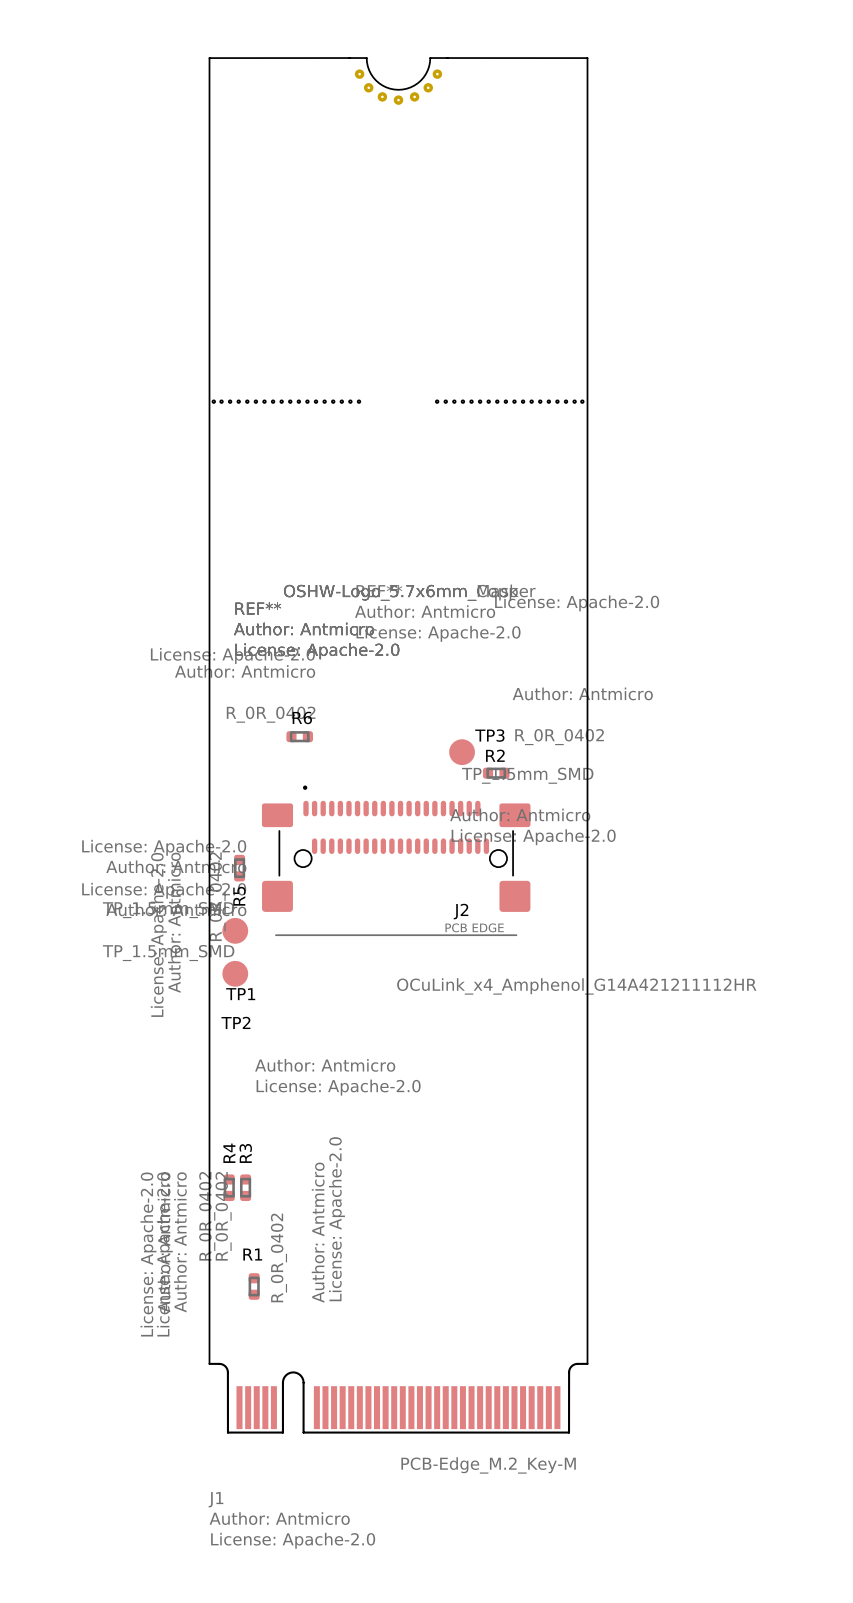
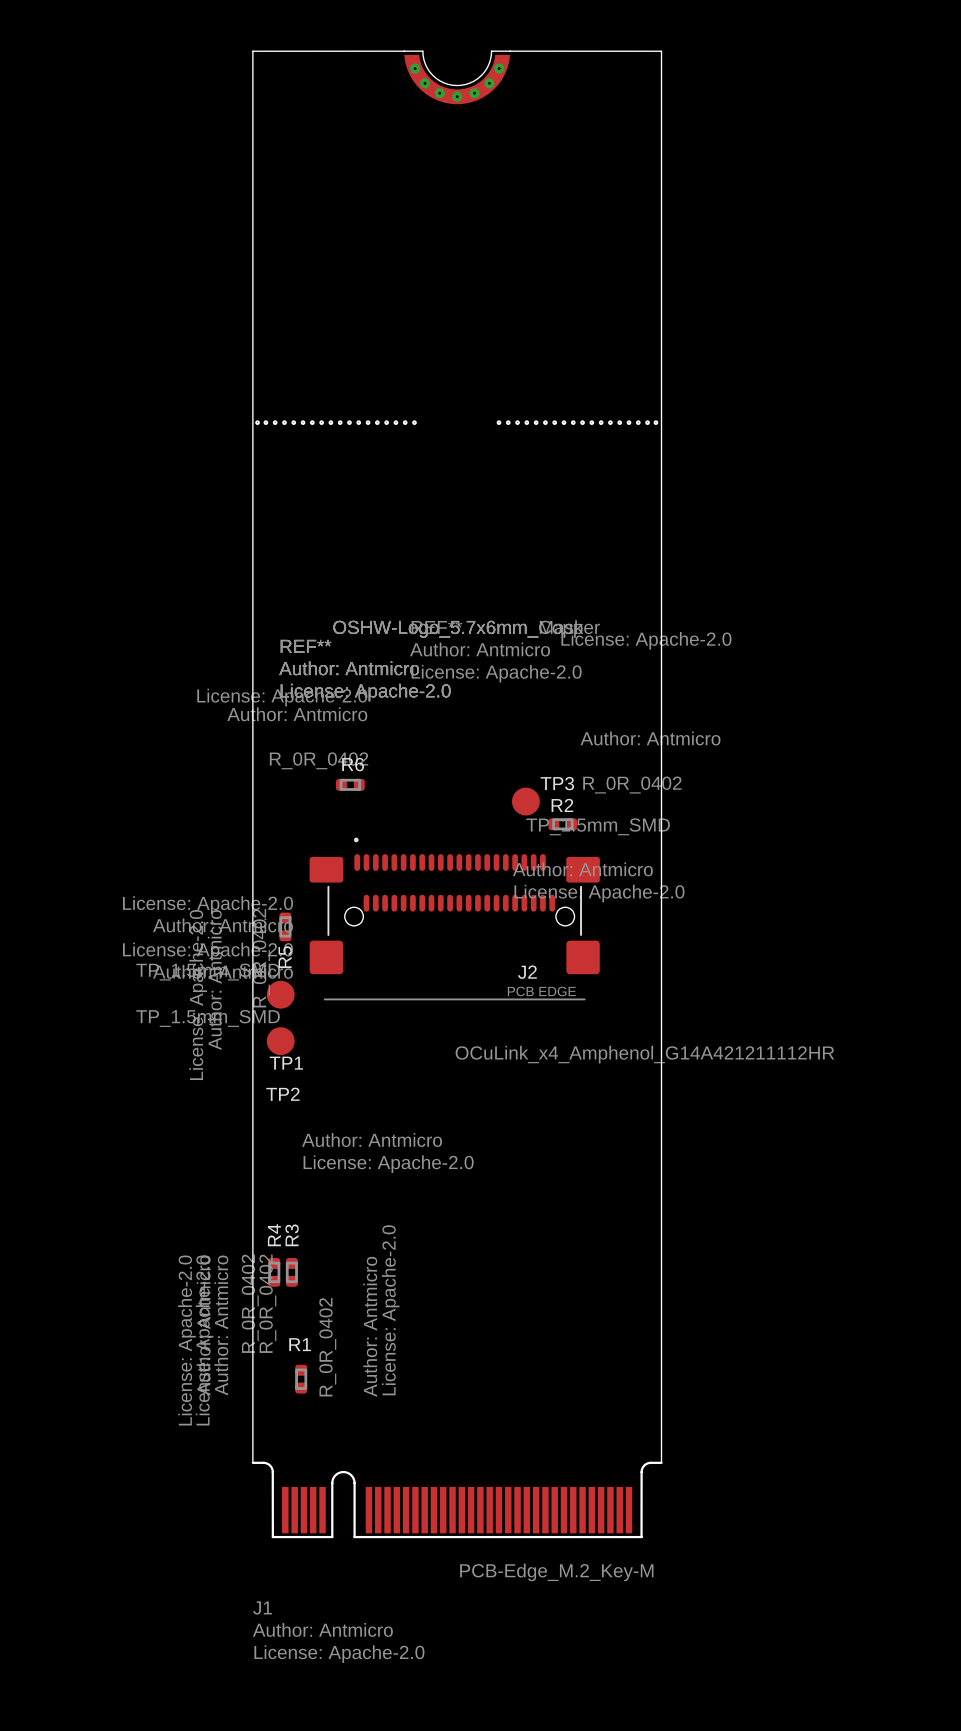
part footprint: [349, 57, 448, 105] -> [403, 50, 511, 105]

